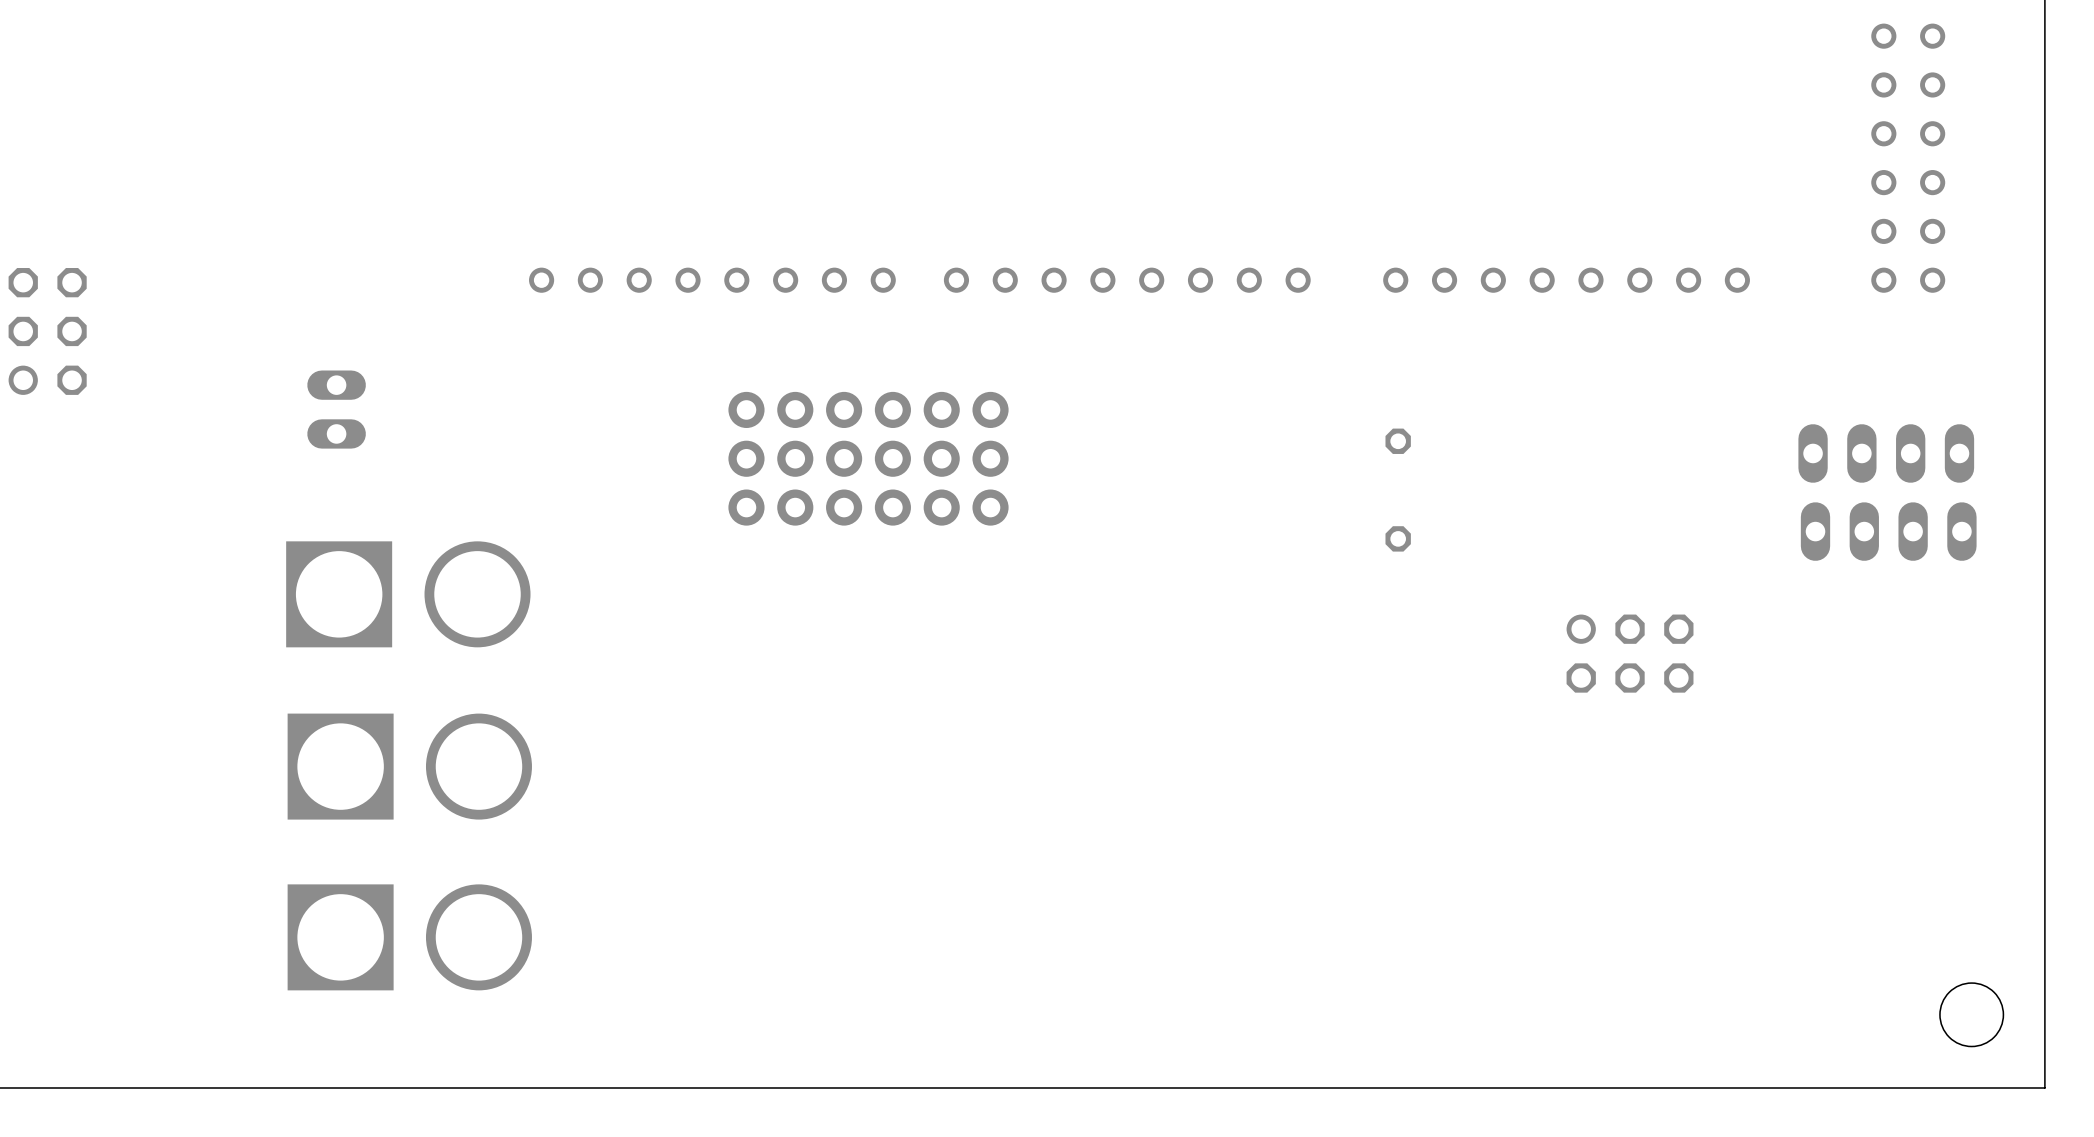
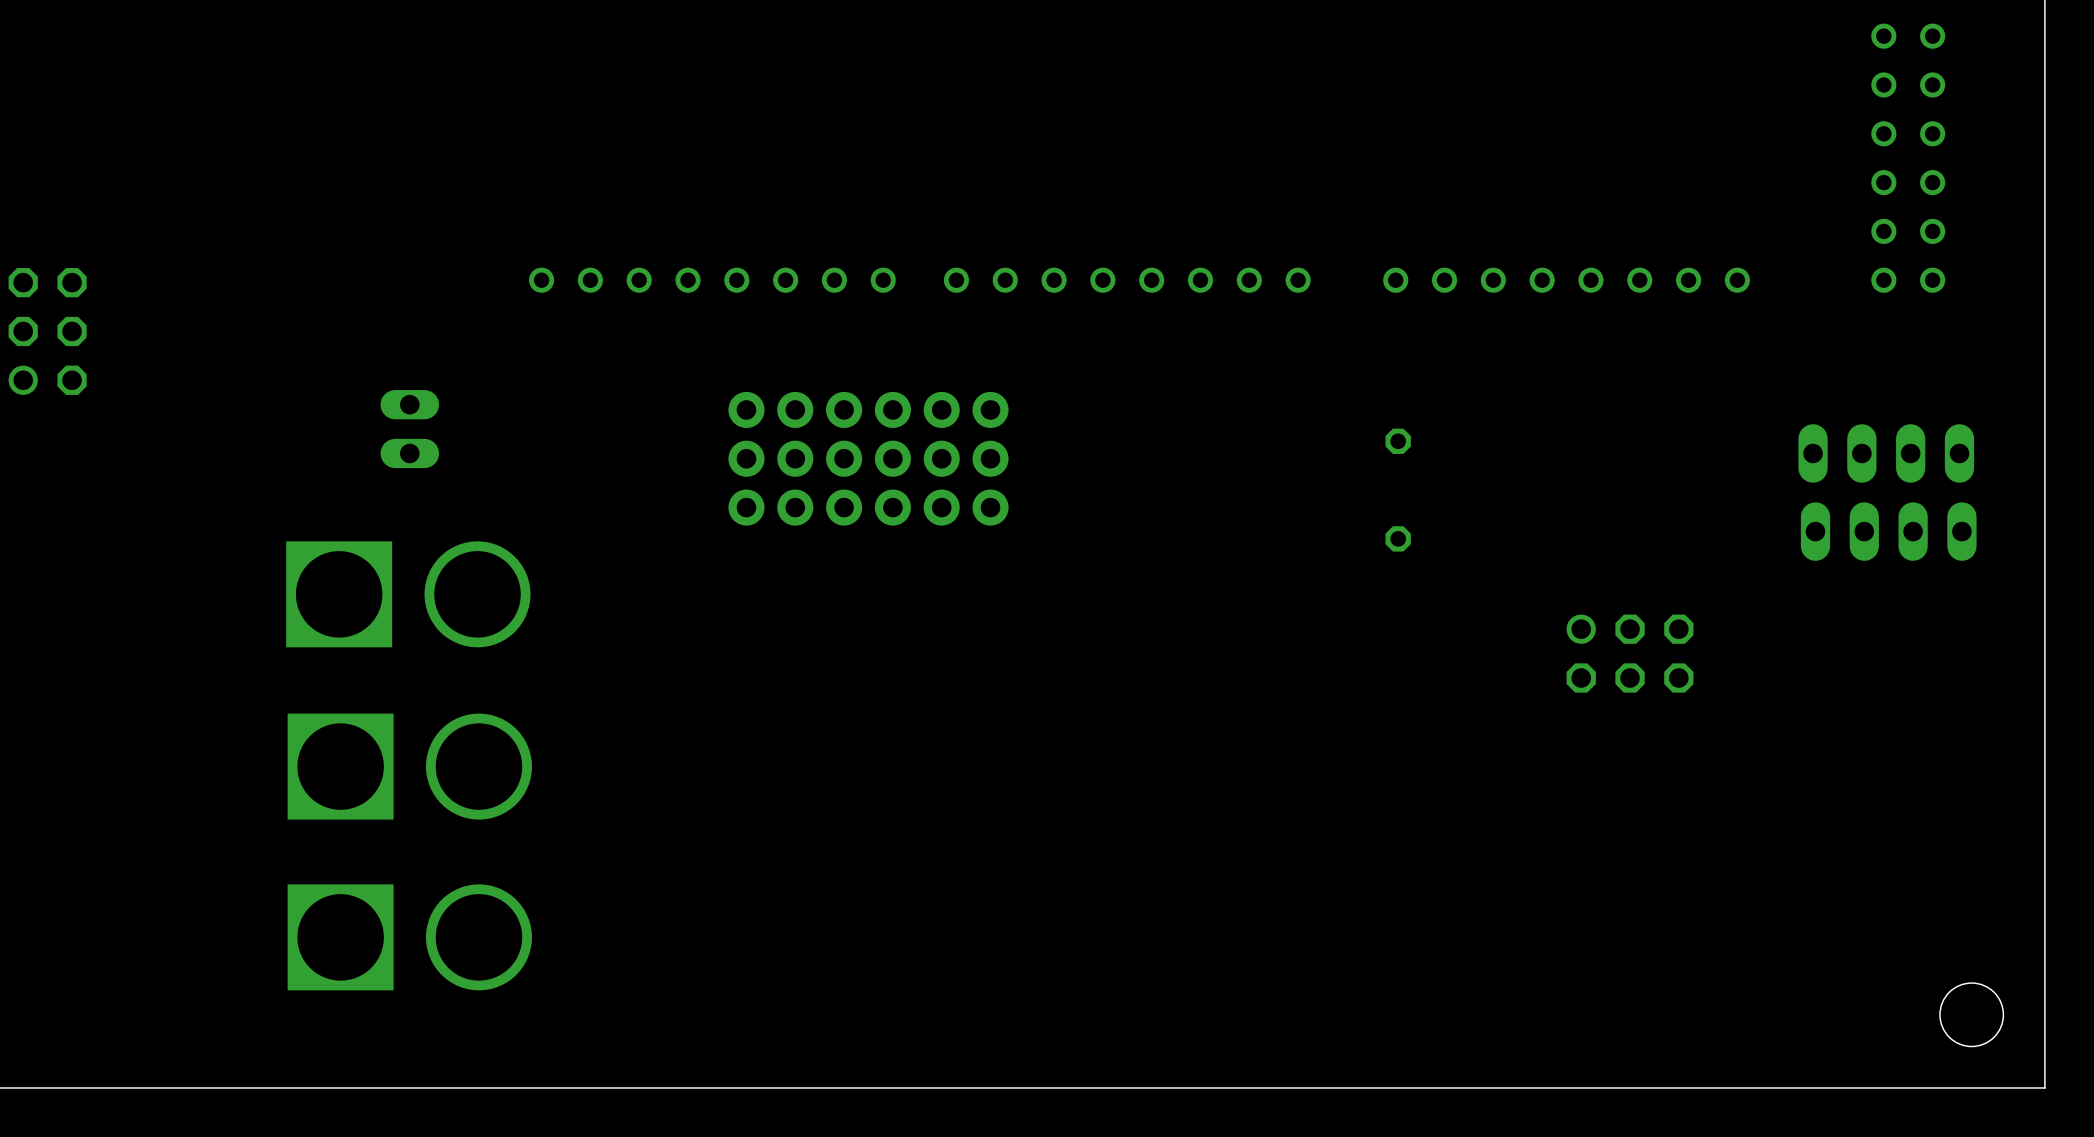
part position: (336, 409) -> (409, 429)

